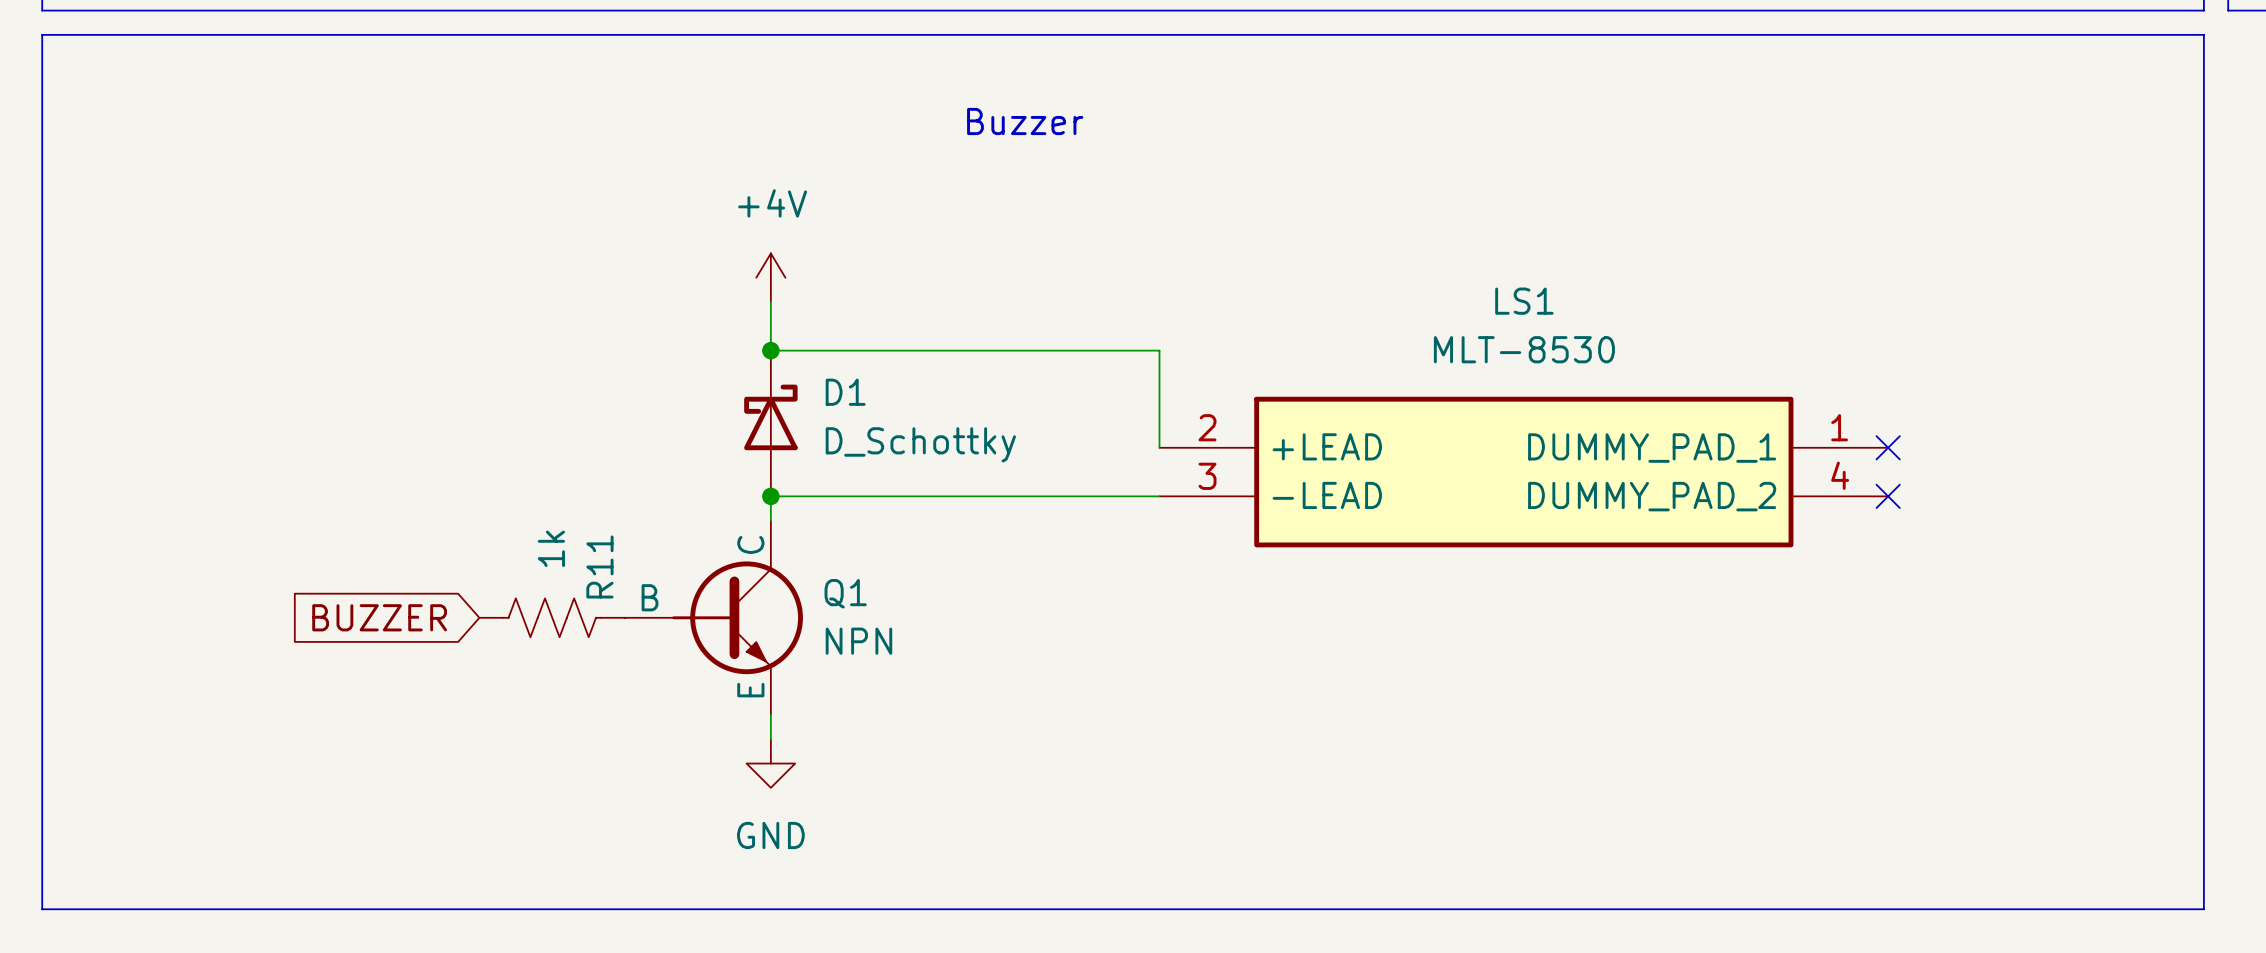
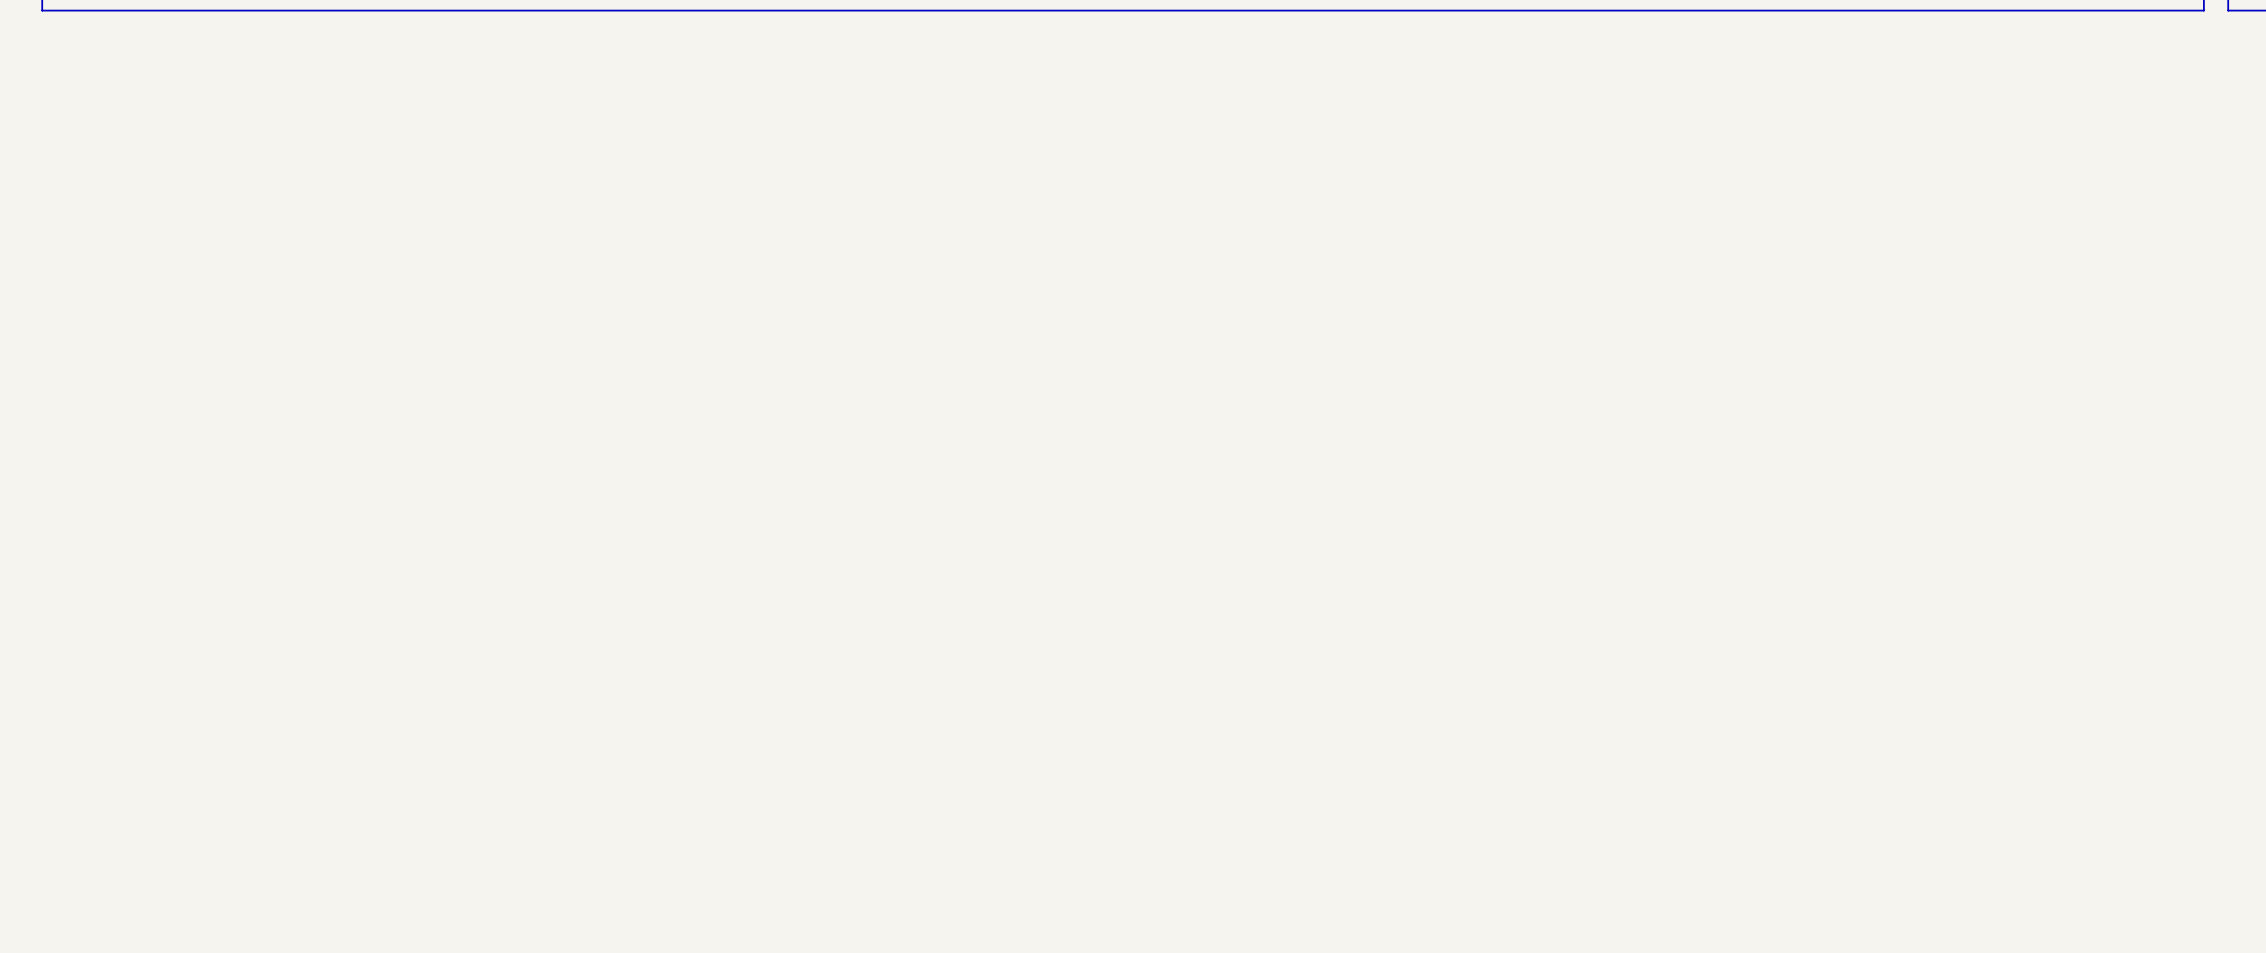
line: (42, 34) (2203, 34) (2203, 909) (42, 909) (42, 34) -> none
text: Buzzer (1025, 121) -> none
power symbol: +4V (770, 277) -> none
wire: (770, 302) (770, 350) (1159, 350) (1159, 447) -> none
junction: (770, 350) -> none
D1: D_Schottky (770, 423) -> none
no-connect mark: (1888, 447) -> none
LS1: MLT-8530 (1523, 472) -> none
junction: (770, 496) -> none
wire: (1159, 496) (770, 496) (770, 520) -> none
no-connect mark: (1888, 496) -> none
global label: BUZZER (379, 617) -> none
R11: 1k (552, 617) -> none
Q1: NPN (714, 617) -> none
wire: (770, 714) (770, 739) -> none
power symbol: GND (770, 763) -> none

